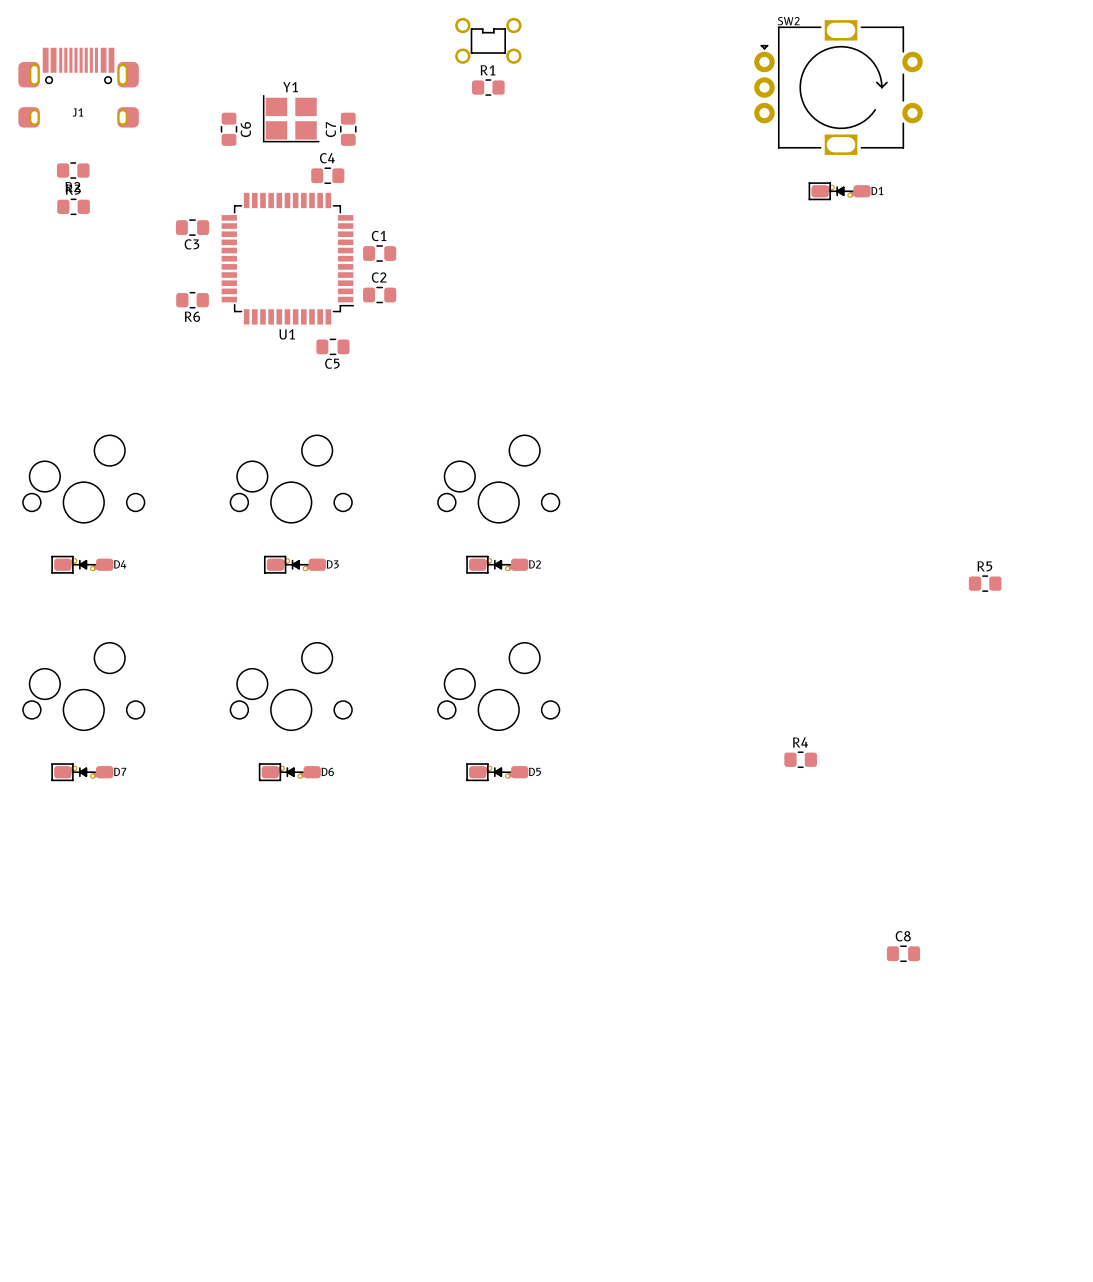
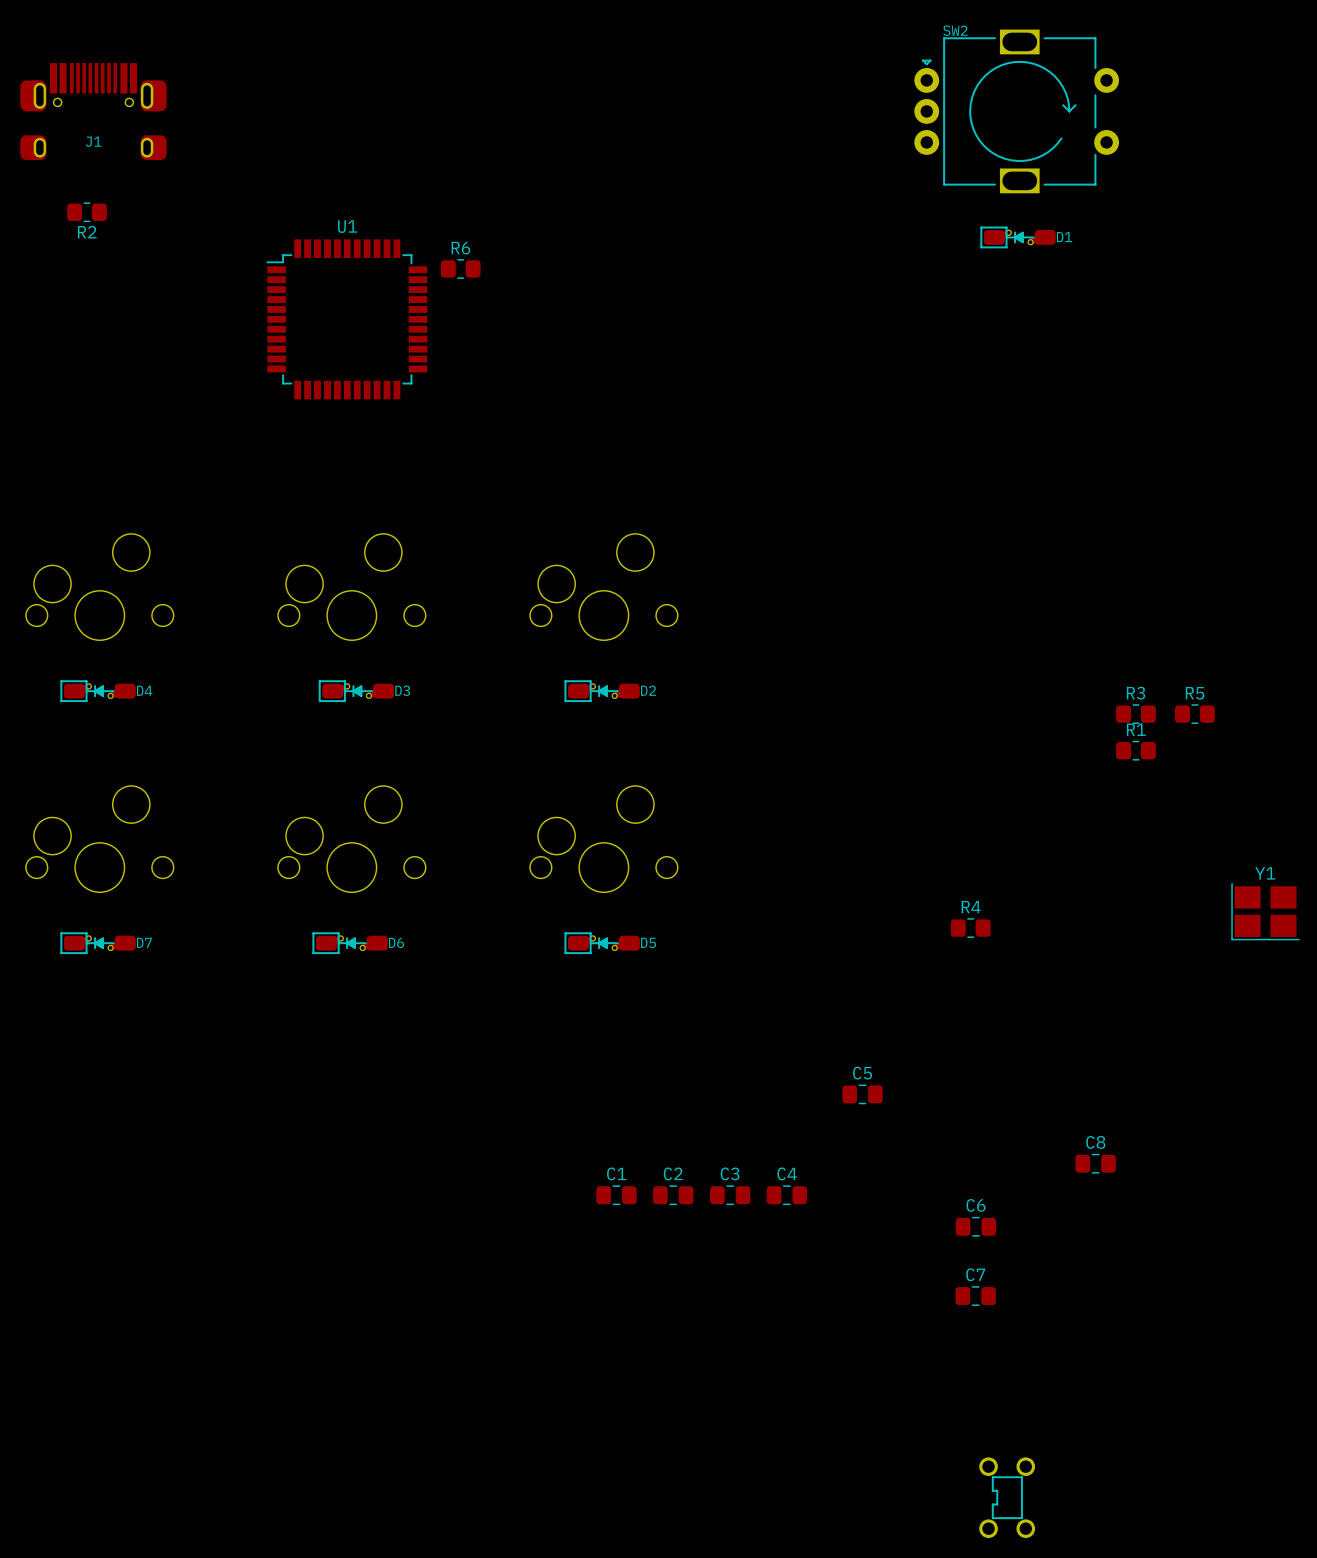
part: (488, 40) -> none
R1 position: (488, 87) -> (1135, 750)
Y1 position: (291, 118) -> (1265, 911)
C6 rotation: 0° (229, 129) -> 90° clockwise (975, 1226)
C6 position: (229, 129) -> (975, 1226)
C6 name position: C6 (245, 129) -> C6 (975, 1205)
C7 rotation: 0° (348, 129) -> 90° clockwise (975, 1296)
C7 position: (348, 129) -> (975, 1296)
C4 position: (327, 175) -> (786, 1195)
R3 position: (73, 206) -> (1135, 714)
C3 position: (192, 227) -> (730, 1195)
C3 name position: C3 (191, 244) -> C3 (730, 1173)
C1 position: (379, 253) -> (616, 1195)
U1 rotation: 0° (287, 258) -> 180° (346, 319)
C2 position: (379, 295) -> (673, 1195)
R6 position: (192, 300) -> (460, 268)
R6 name position: R6 (192, 316) -> R6 (460, 248)
C5 position: (332, 346) -> (862, 1094)
C5 name position: C5 (332, 363) -> C5 (862, 1073)
part: none -> (1007, 1497)

